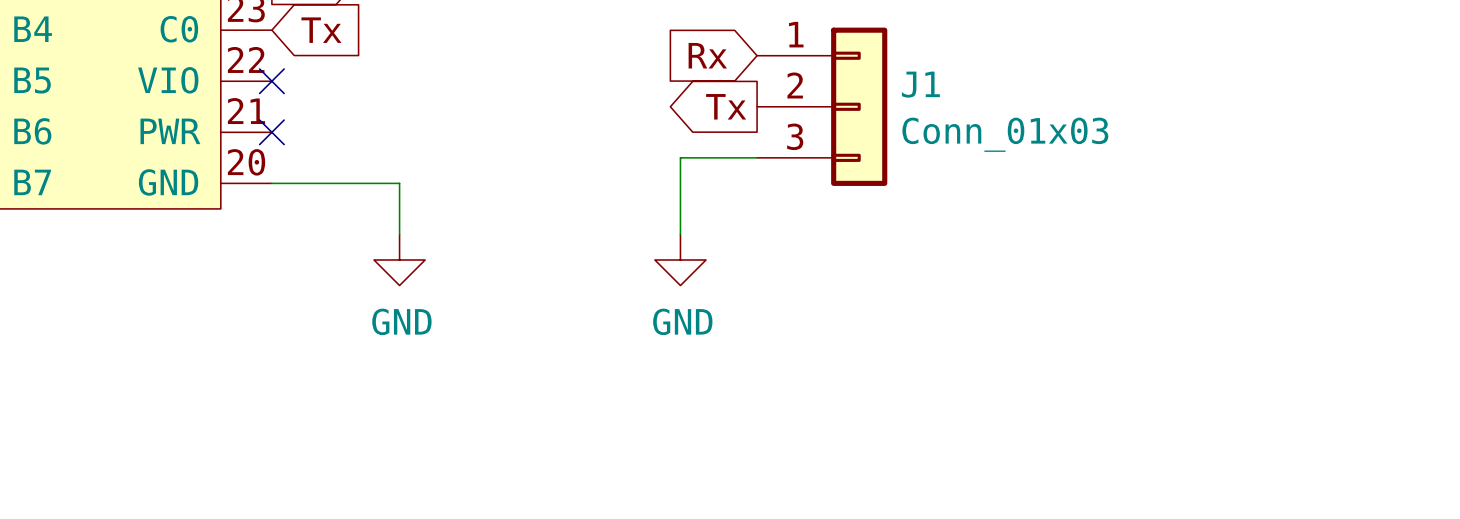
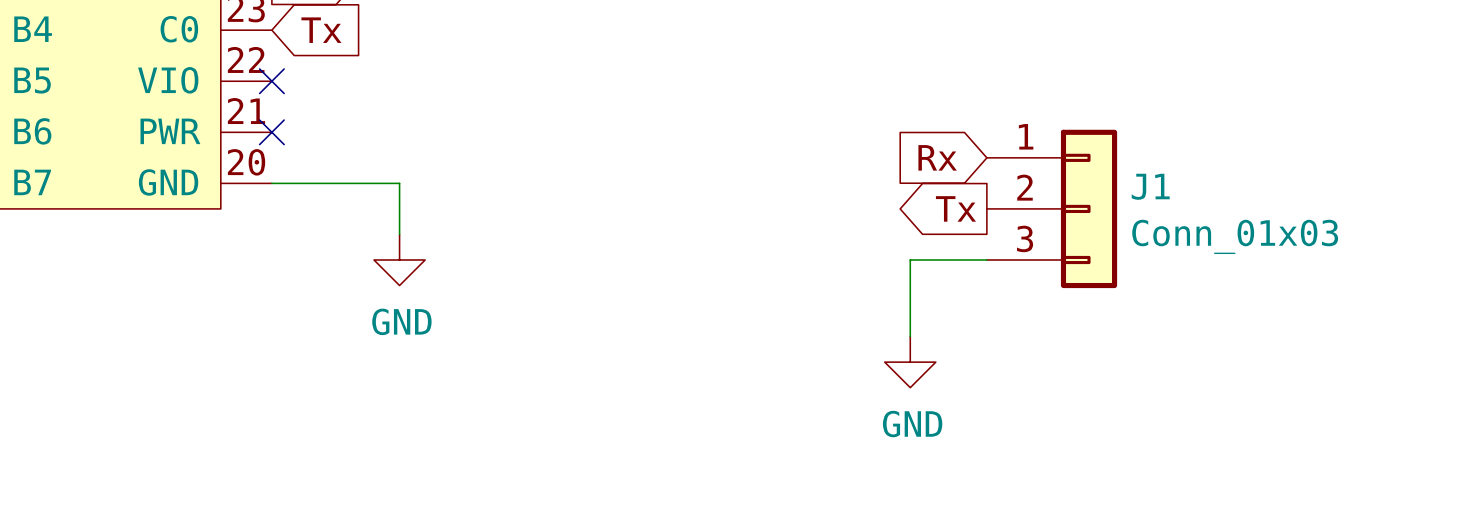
global label position: Rx (707, 55) -> Rx (937, 157)
global label position: Tx (726, 106) -> Tx (955, 208)
J1 position: (822, 106) -> (1051, 208)
wire: (757, 157) (680, 157) (680, 234) -> (986, 259) (910, 259) (910, 336)
power symbol position: GND (680, 259) -> GND (910, 362)

